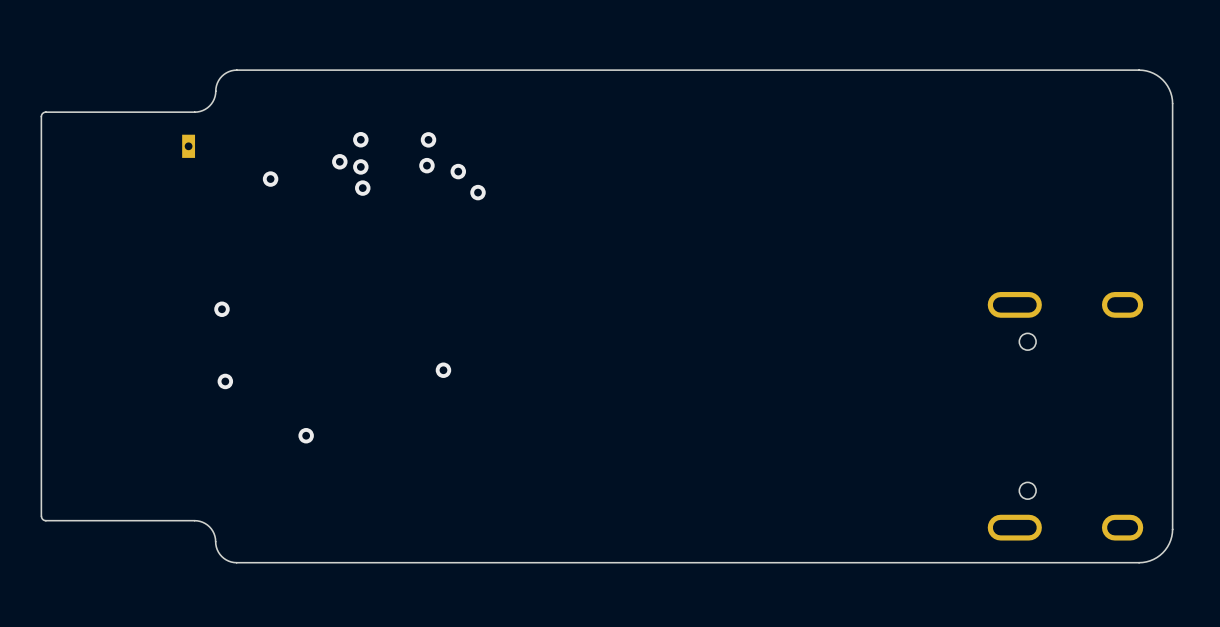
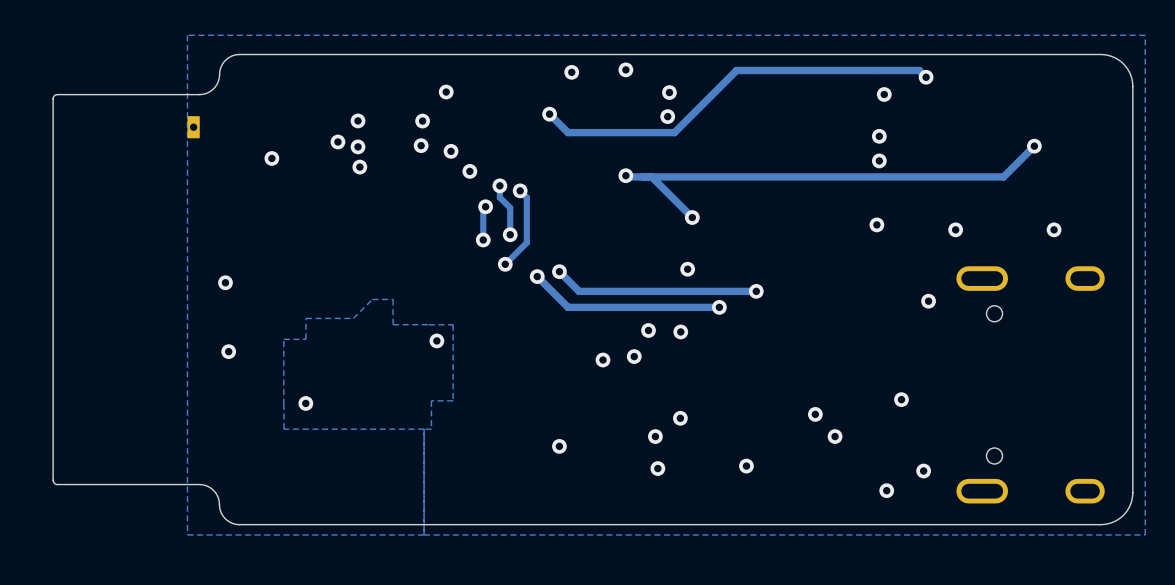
zone outline: none -> (1145, 35) (187, 35) (187, 534) (1145, 534) (1145, 35)
via: none -> (625, 69)
via: none -> (571, 72)
track: none -> (926, 77) (919, 70) (736, 70) (674, 132) (568, 132) (549, 114)
via: none -> (926, 77)
via: none -> (446, 92)
via: none -> (669, 92)
via: none -> (884, 94)
via: none -> (549, 114)
via: none -> (667, 116)
via: none -> (879, 136)
track: none -> (1034, 146) (1003, 176) (625, 175)
via: none -> (1034, 146)
via: none -> (879, 160)
via: none -> (625, 175)
track: none -> (651, 176) (692, 217)
track: none -> (499, 185) (499, 197) (510, 207) (510, 234)
via: none -> (499, 185)
track: none -> (520, 190) (526, 197) (526, 242) (505, 264)
via: none -> (520, 190)
track: none -> (485, 206) (483, 209) (483, 239)
via: none -> (485, 206)
via: none -> (692, 217)
via: none -> (876, 224)
via: none -> (955, 229)
via: none -> (1054, 229)
via: none -> (510, 234)
via: none -> (483, 239)
via: none -> (505, 264)
via: none -> (687, 269)
track: none -> (559, 271) (579, 291) (756, 291)
via: none -> (559, 271)
track: none -> (537, 276) (568, 307) (719, 307)
via: none -> (537, 276)
via: none -> (756, 291)
zone outline: none -> (393, 299) (372, 299) (353, 318) (305, 318) (305, 339) (283, 339) (283, 429) (431, 429) (431, 400) (453, 400) (453, 324) (393, 324) (393, 299)
via: none -> (928, 301)
via: none -> (719, 307)
via: none -> (648, 330)
via: none -> (680, 331)
via: none -> (634, 356)
via: none -> (602, 360)
via: none -> (901, 399)
via: none -> (815, 414)
via: none -> (680, 418)
zone outline: none -> (424, 429) (424, 534)
via: none -> (655, 436)
via: none -> (835, 436)
via: none -> (559, 446)
via: none -> (746, 466)
via: none -> (657, 468)
via: none -> (923, 471)
via: none -> (886, 490)

